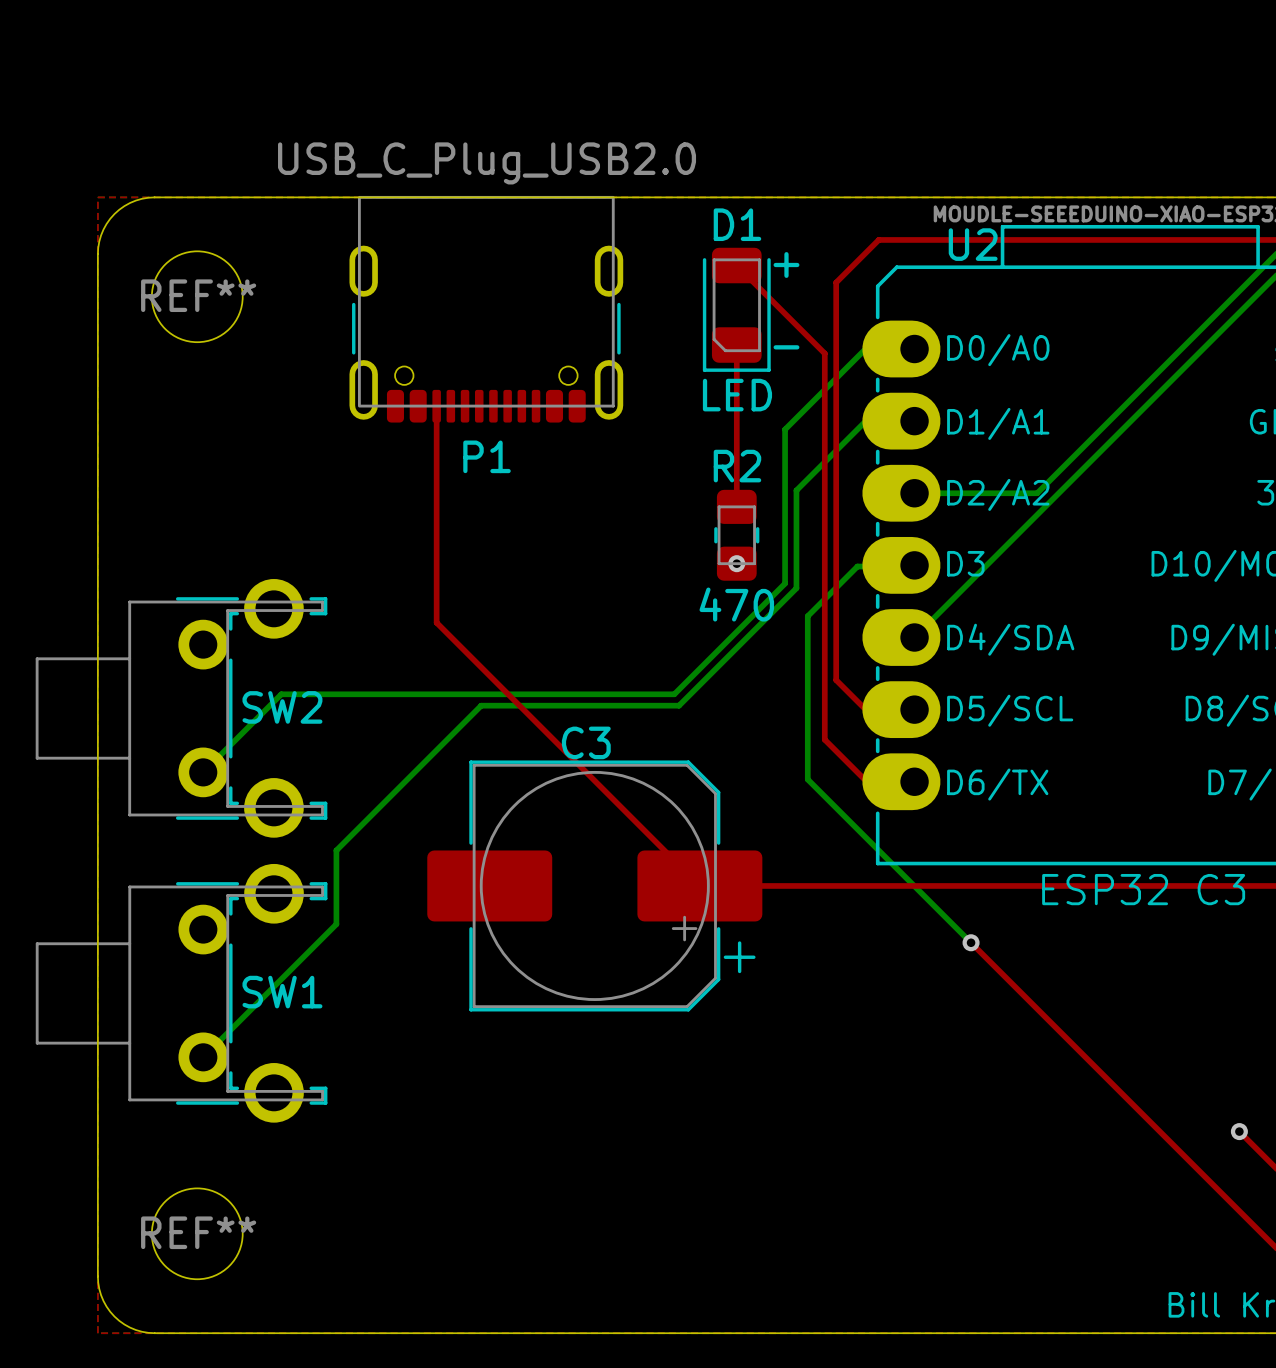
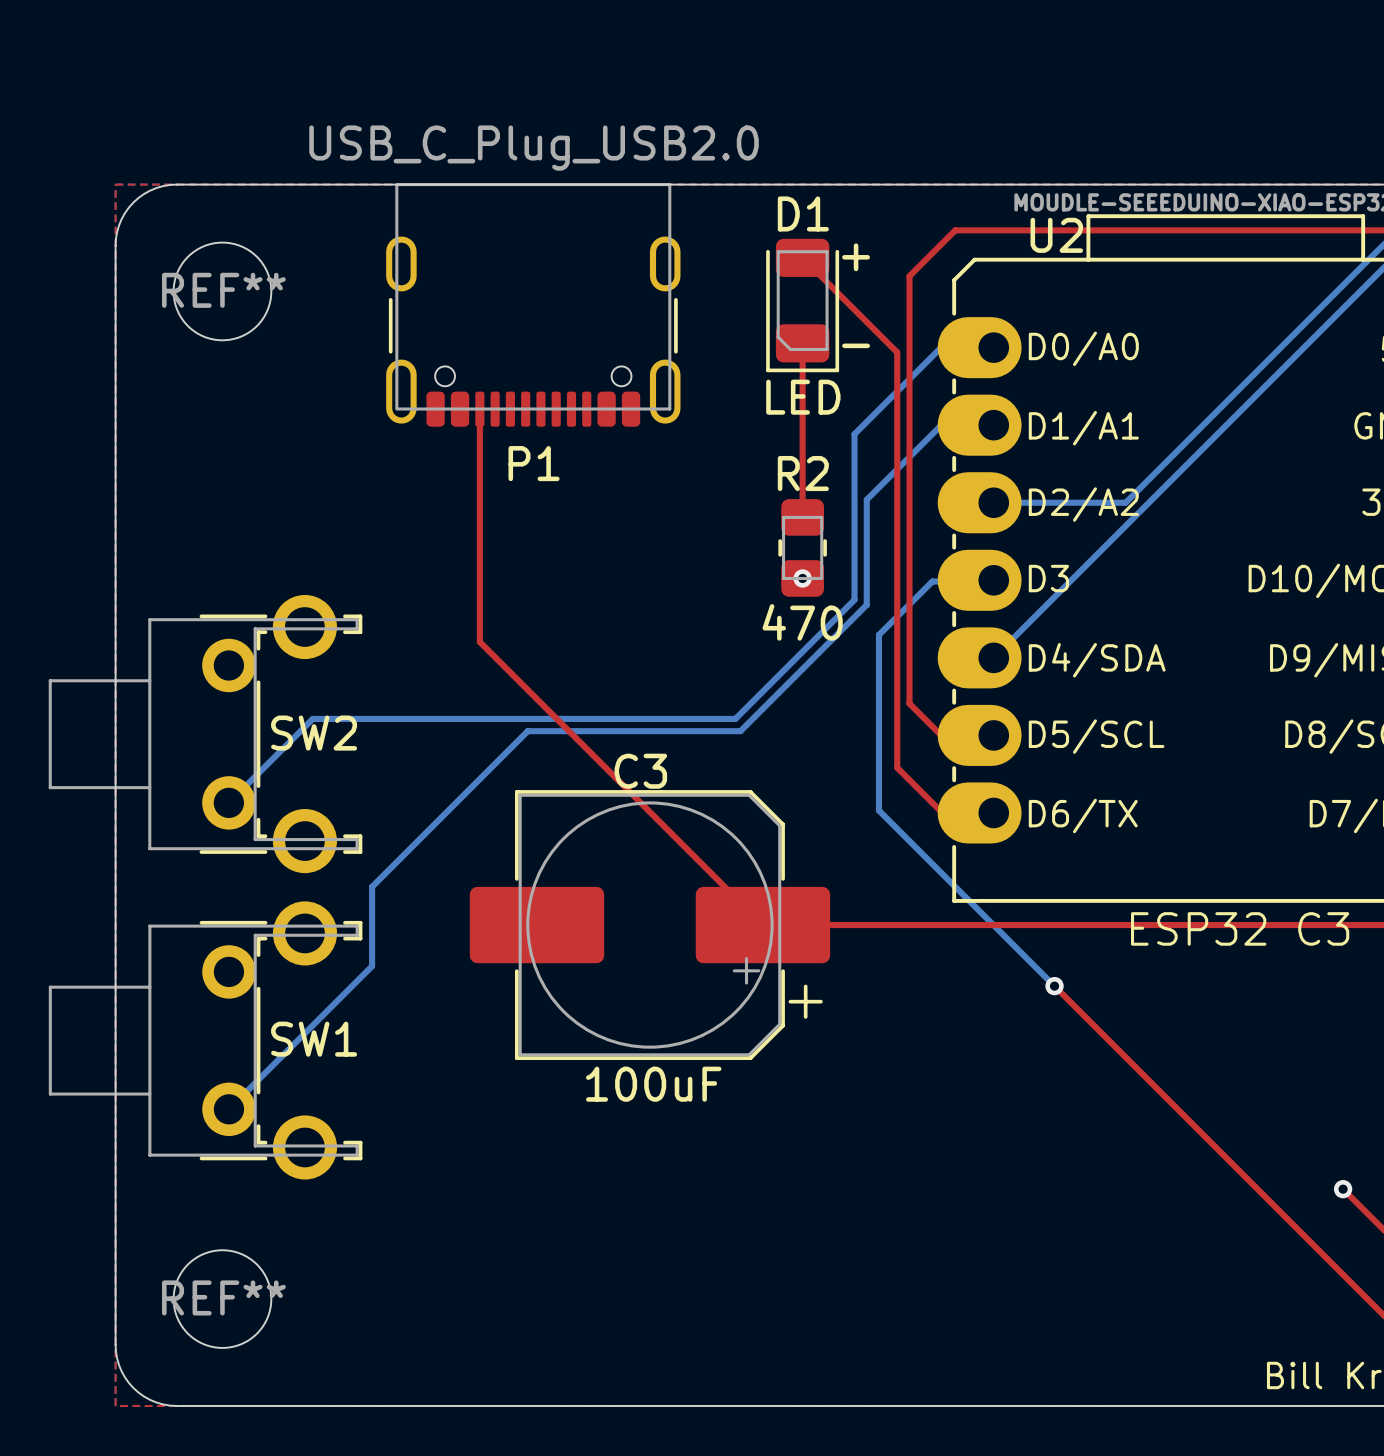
C3 value: none -> 100uF (653, 1084)

